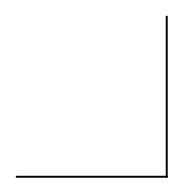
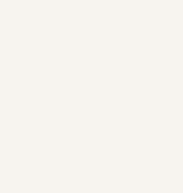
wire: (166, 16) (166, 176) (16, 176) -> none

